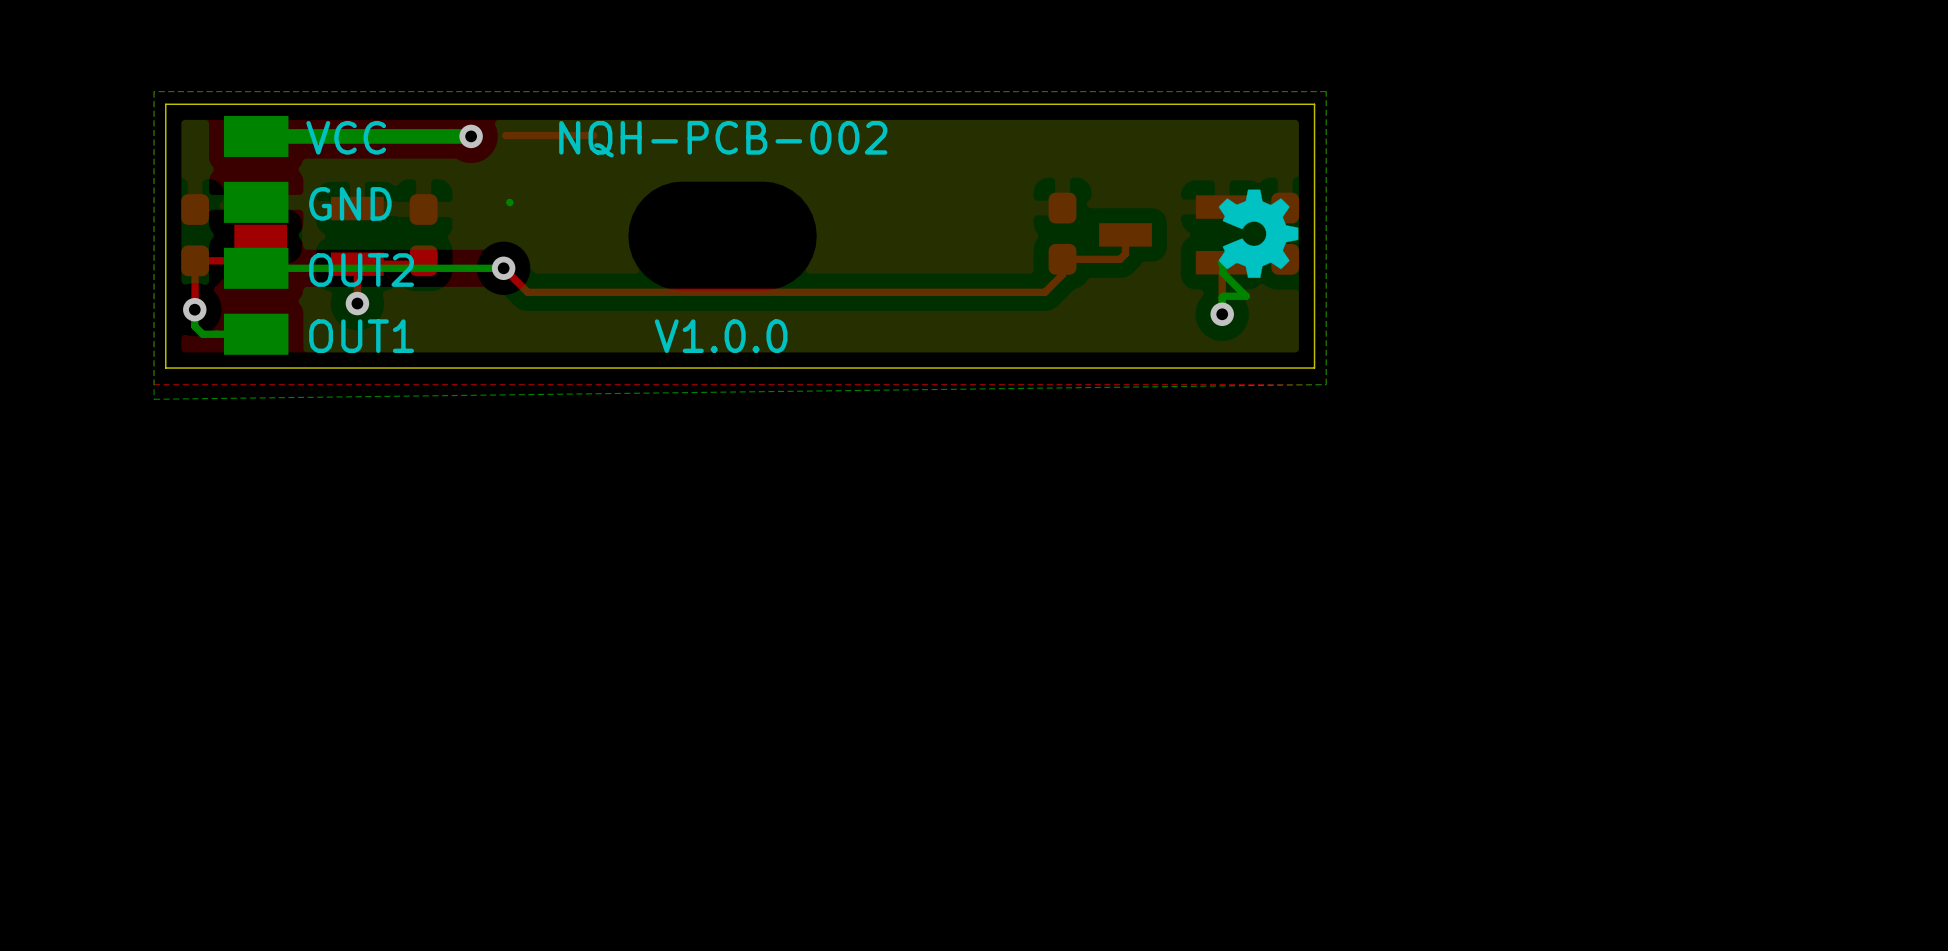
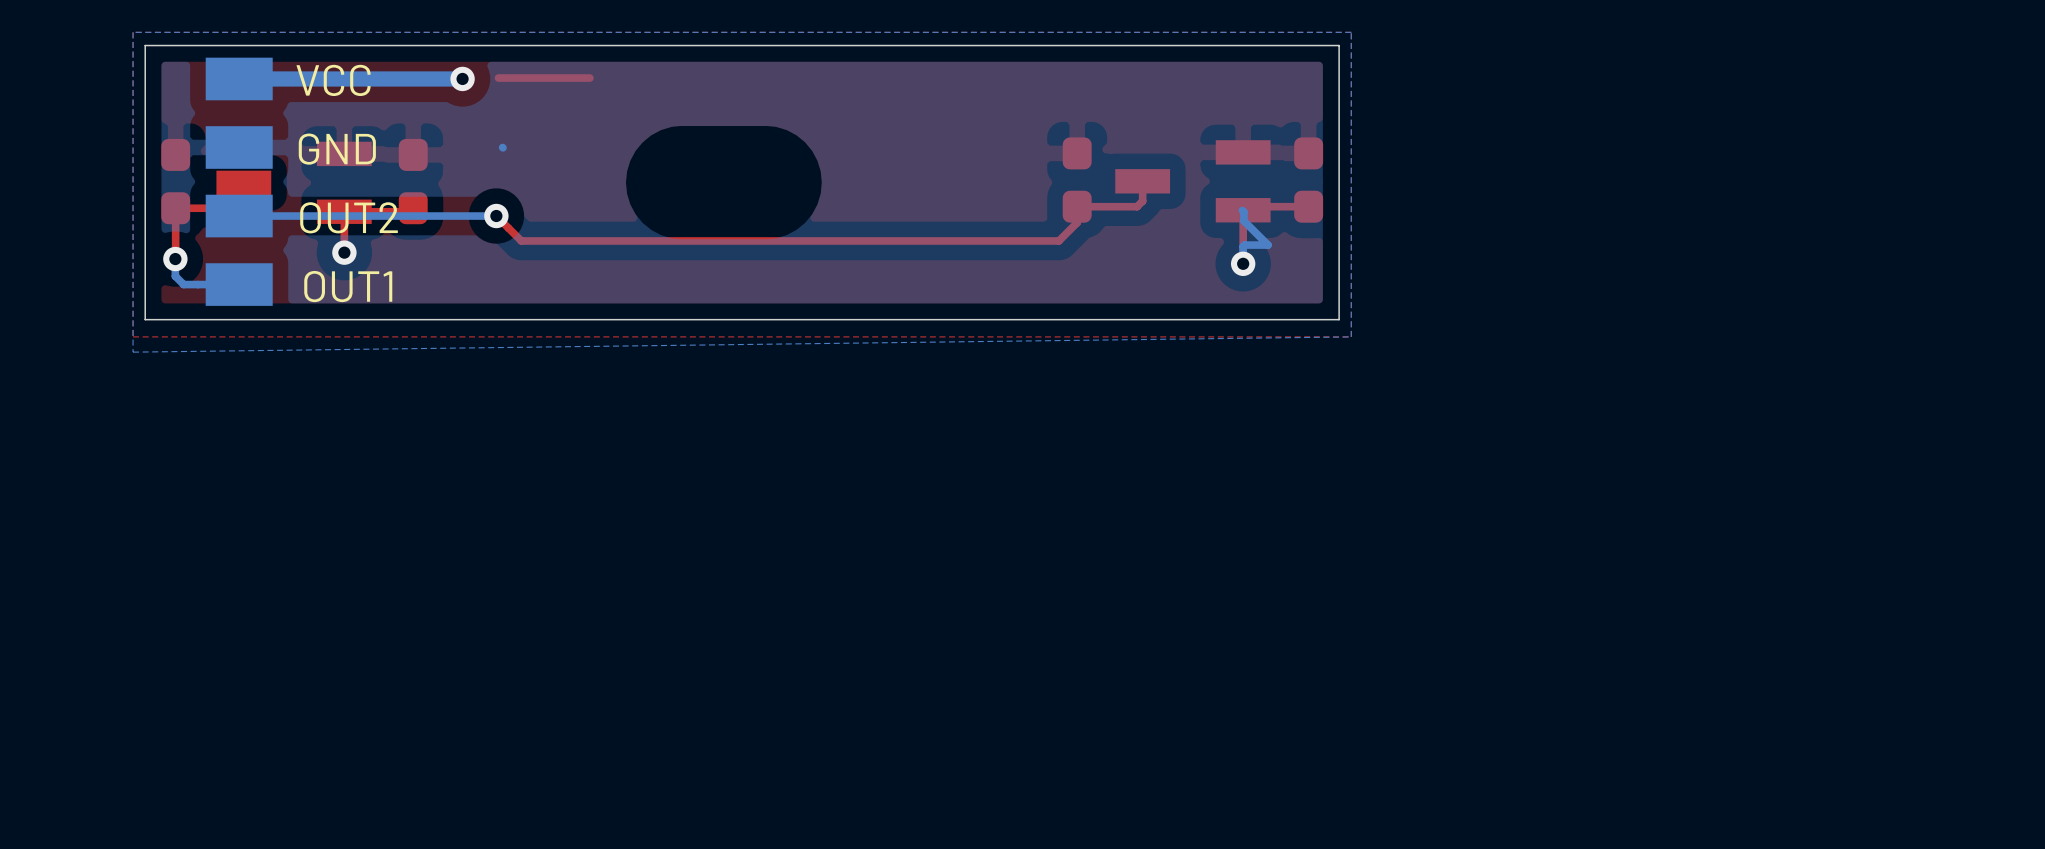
text: NQH-PCB-002 (723, 139) -> none
drawing: [1218, 189, 1299, 278] -> none
text: V1.0.0 (721, 336) -> none

